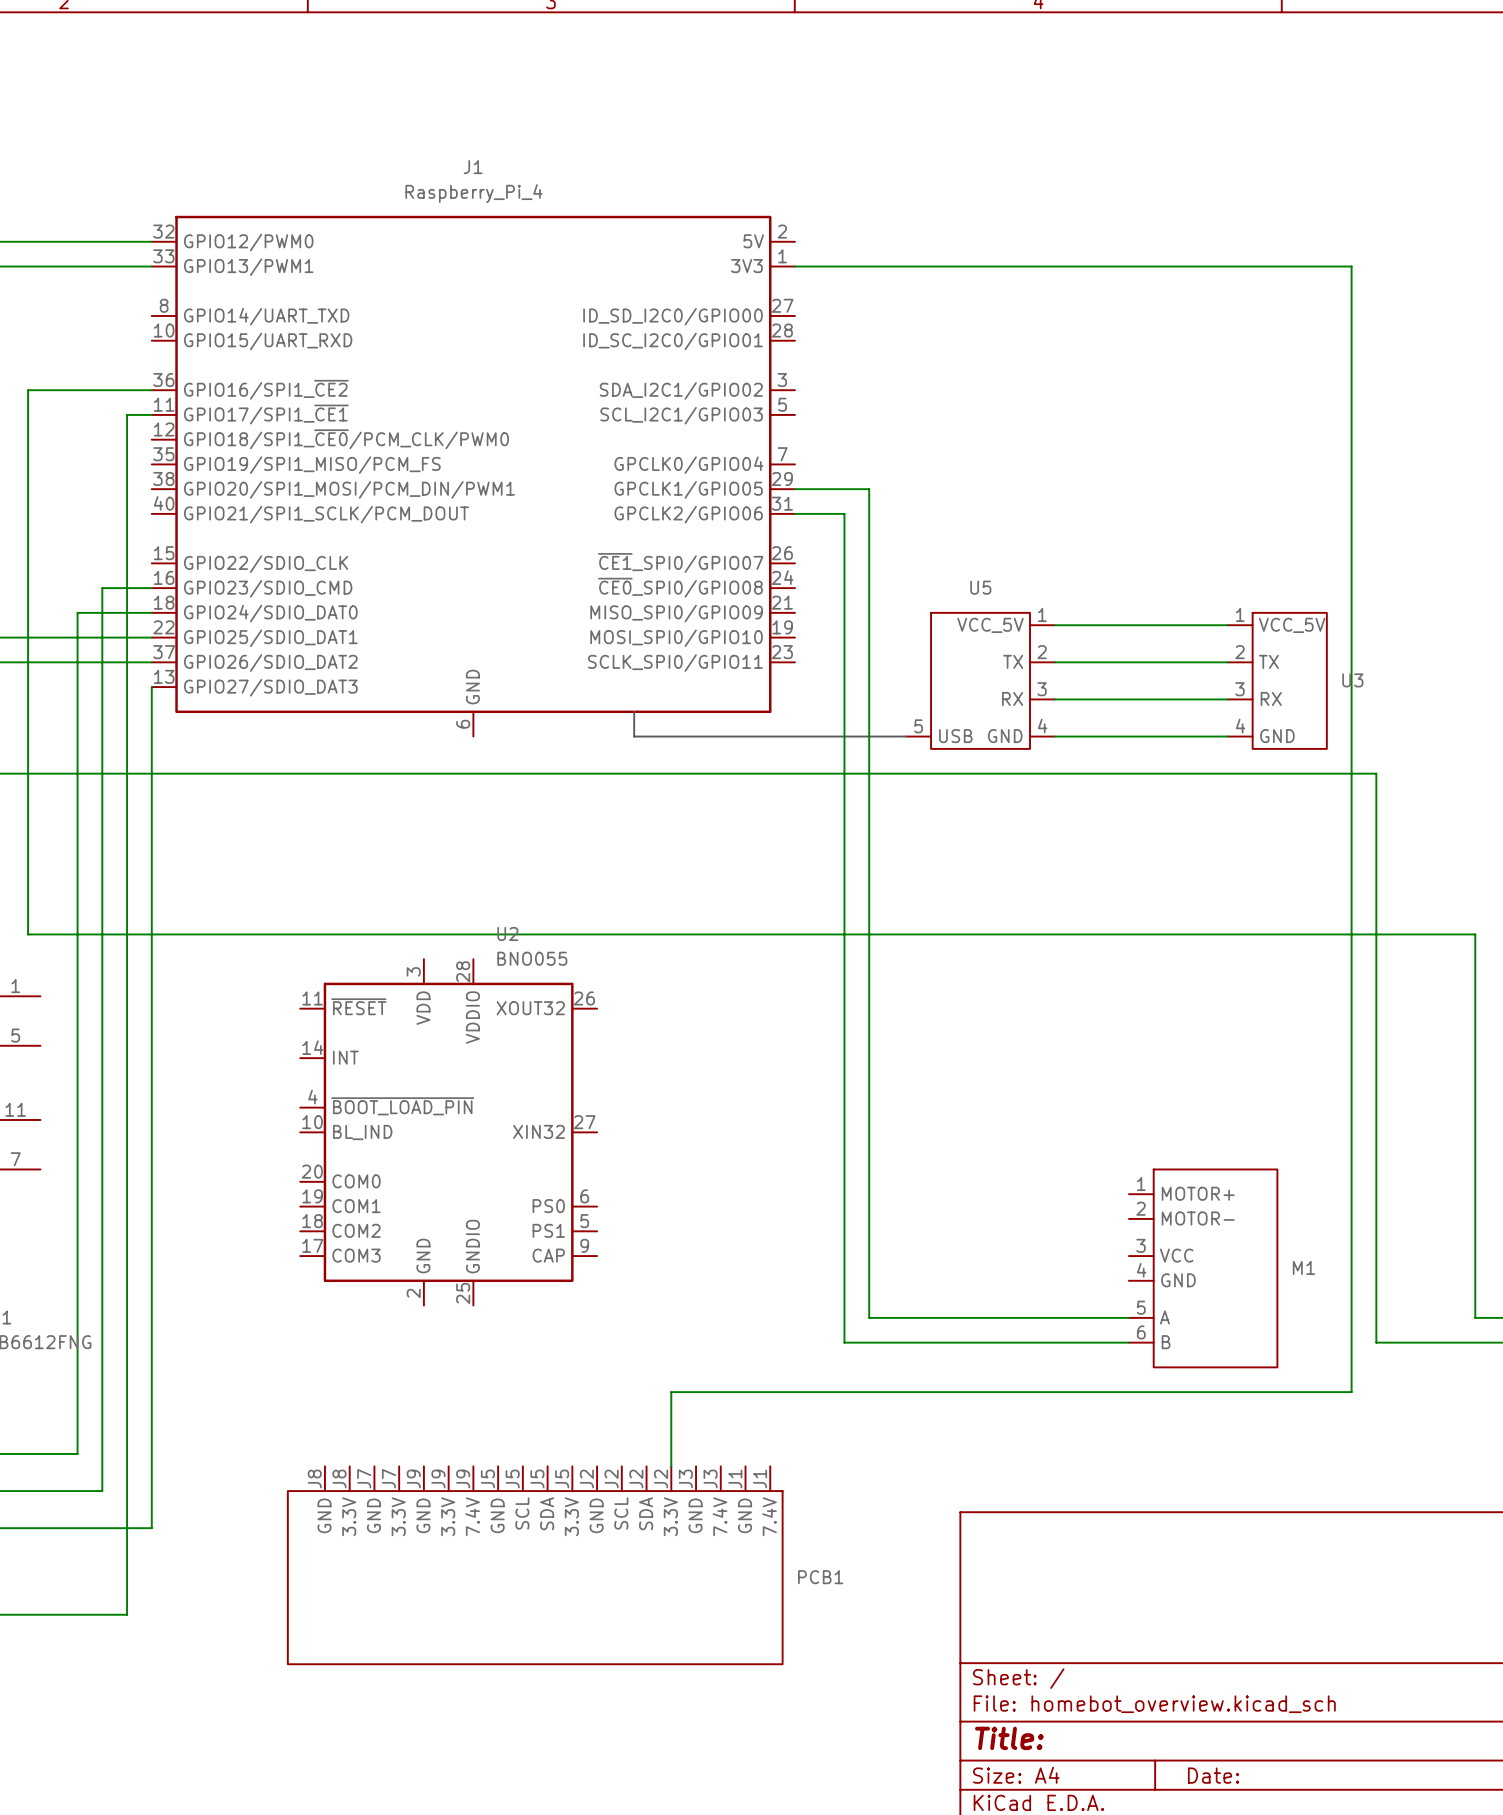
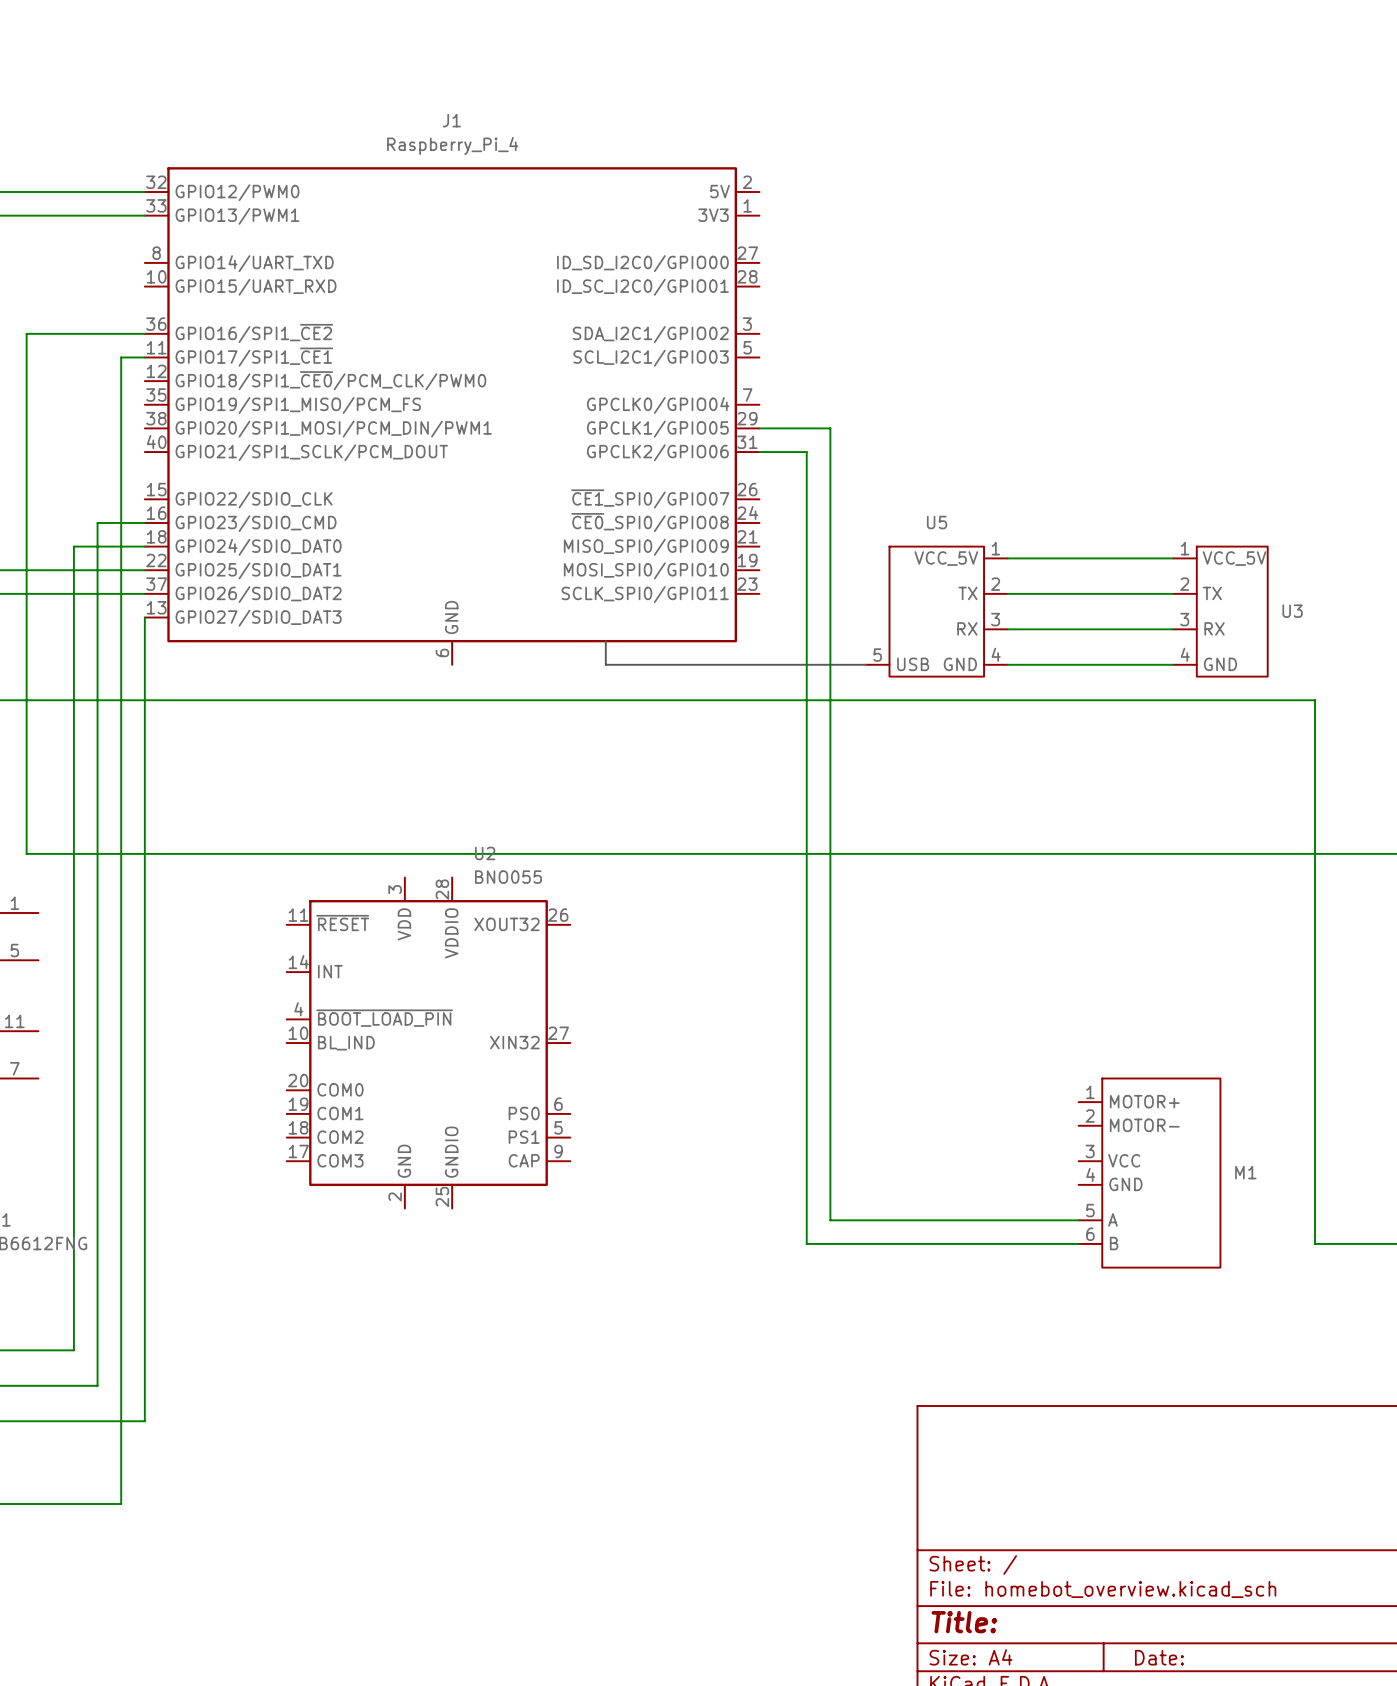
wire: (794, 266) (1351, 266) (1351, 1392) (671, 1392) (671, 1466) -> none
PCB1: (535, 1565) -> none

